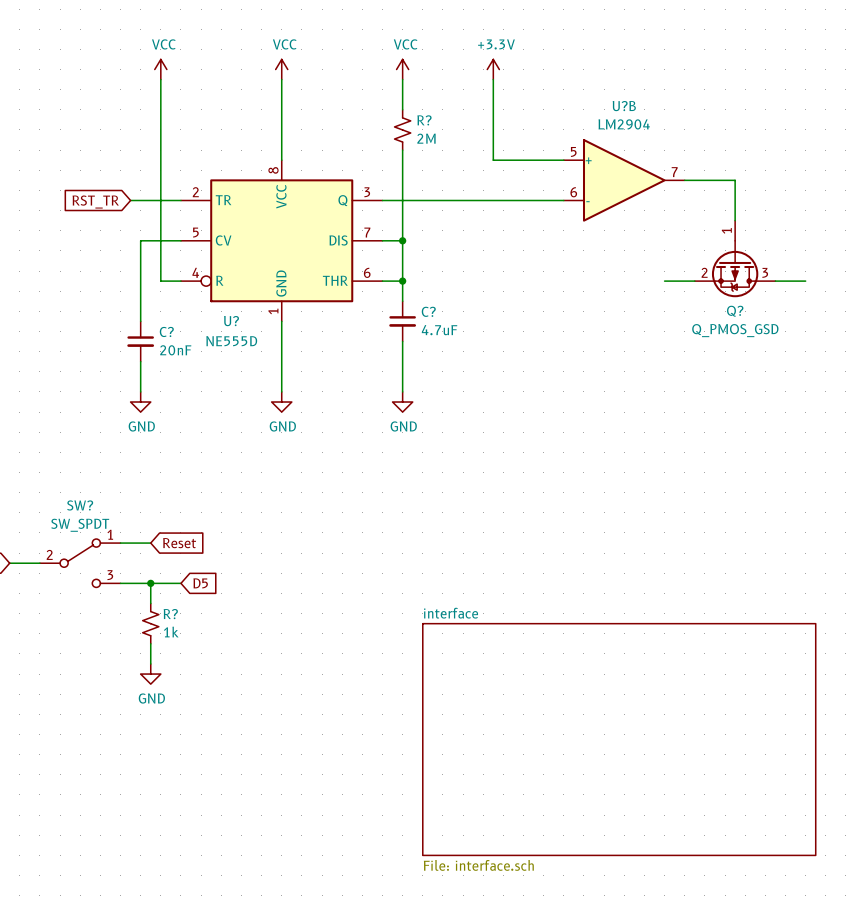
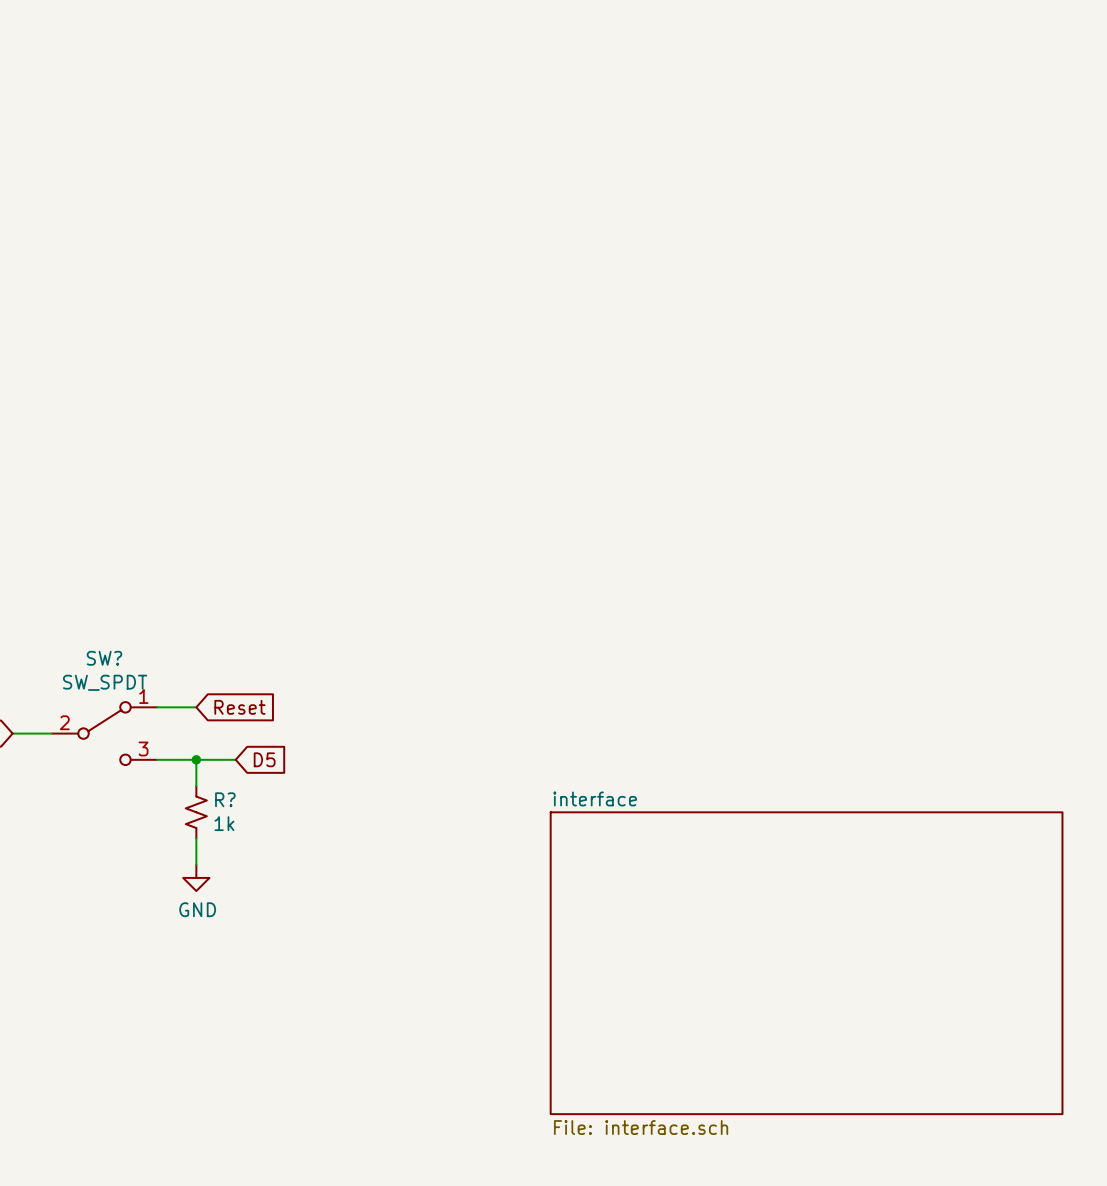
power symbol: VCC (160, 69) -> none
power symbol: VCC (281, 69) -> none
power symbol: VCC (402, 69) -> none
power symbol: +3.3V (493, 69) -> none
wire: (160, 79) (160, 281) (180, 281) -> none
wire: (281, 79) (281, 160) -> none
wire: (402, 79) (402, 109) -> none
wire: (493, 79) (493, 160) (563, 160) -> none
R?: 2M (402, 129) -> none
wire: (402, 150) (402, 301) -> none
U?B: LM2904 (624, 180) -> none
wire: (684, 180) (735, 180) (735, 220) -> none
wire: (130, 200) (180, 200) -> none
wire: (382, 200) (563, 200) -> none
global label: RST_TR (95, 202) -> none
wire: (180, 240) (140, 240) (140, 321) -> none
U?: NE555D (281, 240) -> none
wire: (382, 240) (402, 240) -> none
junction: (402, 240) -> none
Q?: Q_PMOS_GSD (735, 258) -> none
wire: (382, 281) (402, 281) -> none
junction: (402, 281) -> none
wire: (664, 281) (694, 281) -> none
wire: (775, 281) (805, 281) -> none
wire: (281, 321) (281, 391) -> none
C?: 4.7uF (402, 321) -> none
C?: 20nF (140, 341) -> none
wire: (402, 341) (402, 391) -> none
wire: (140, 361) (140, 391) -> none
power symbol: GND (140, 402) -> none
power symbol: GND (281, 402) -> none
power symbol: GND (402, 402) -> none

